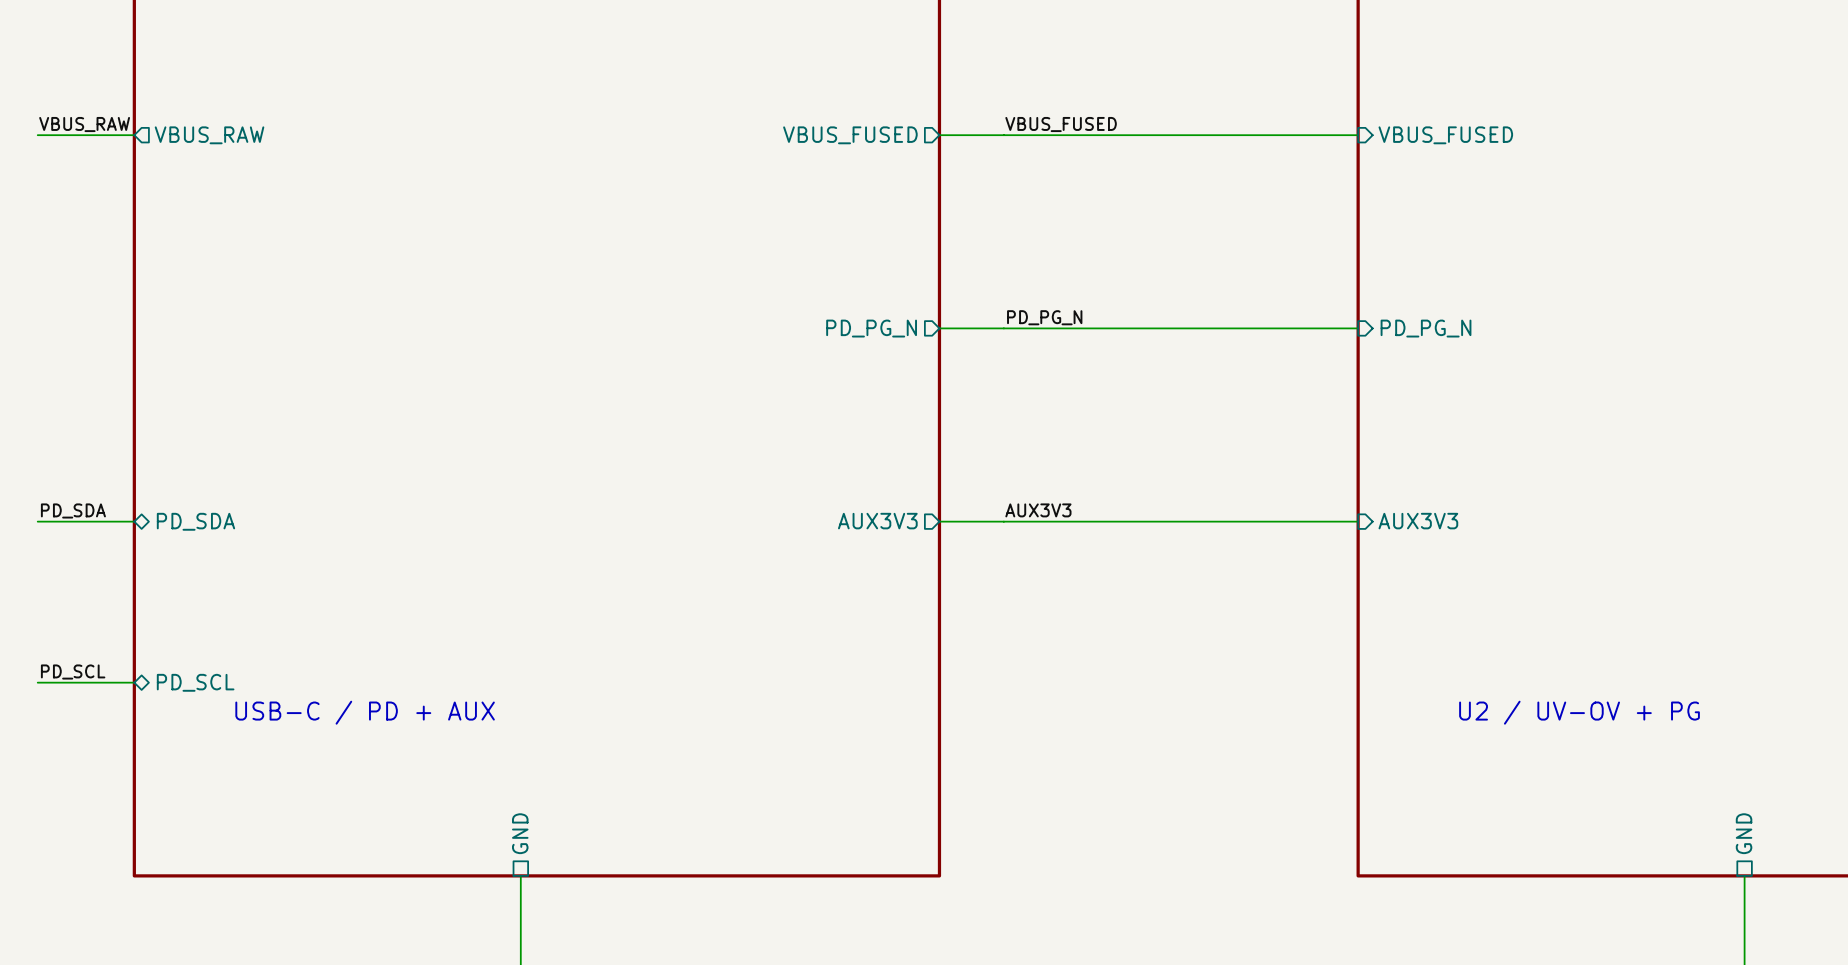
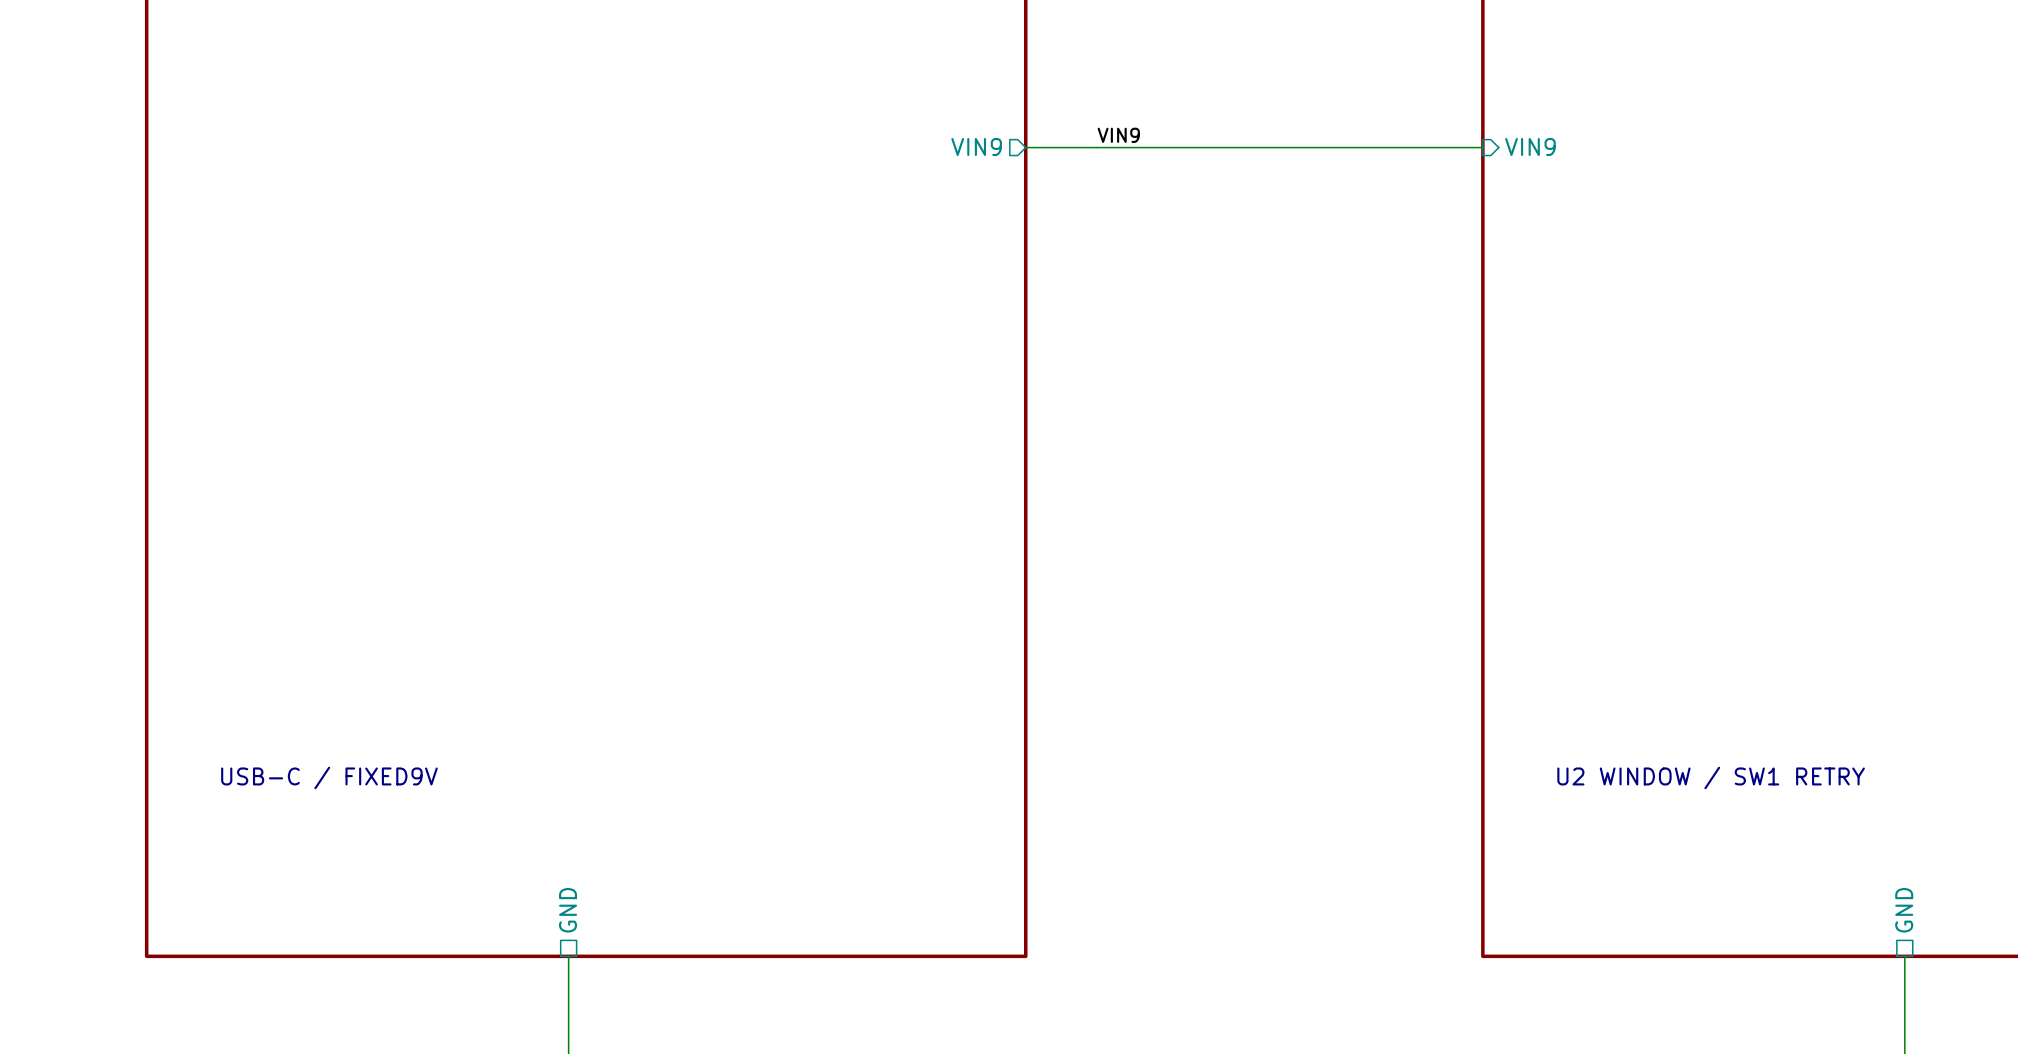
label: VBUS_RAW (84, 124) -> none
label: VBUS_FUSED (1061, 124) -> VIN9 (1118, 135)
wire: (37, 135) (134, 135) -> none
sheet pin: VBUS_RAW (209, 135) -> none
sheet pin: VBUS_FUSED (850, 135) -> VIN9 (976, 146)
sheet pin: VBUS_FUSED (1445, 135) -> VIN9 (1530, 146)
label: PD_PG_N (1044, 317) -> none
sheet pin: PD_PG_N (871, 328) -> none
wire: (939, 328) (1358, 328) -> none
sheet pin: PD_PG_N (1426, 328) -> none
label: PD_SDA (73, 510) -> none
label: AUX3V3 (1038, 510) -> none
wire: (37, 521) (134, 521) -> none
sheet pin: PD_SDA (195, 521) -> none
sheet pin: AUX3V3 (877, 521) -> none
wire: (939, 521) (1358, 521) -> none
sheet pin: AUX3V3 (1418, 521) -> none
label: PD_SCL (73, 671) -> none
wire: (37, 682) (134, 682) -> none
sheet pin: PD_SCL (195, 682) -> none
text: none -> USB-C / FIXED9V (329, 777)
text: USB-C / PD + AUX (365, 712) -> none
text: none -> U2 WINDOW / SW1 RETRY (1711, 777)
text: U2 / UV-OV + PG (1579, 712) -> none

